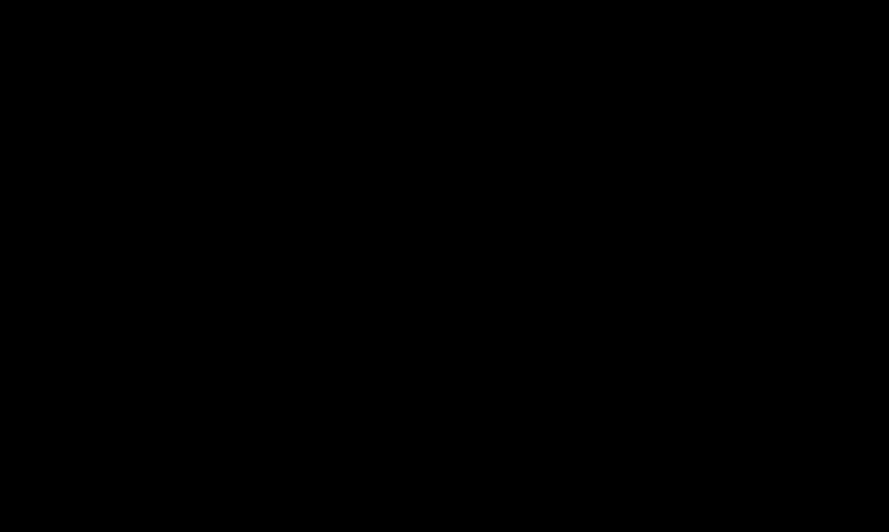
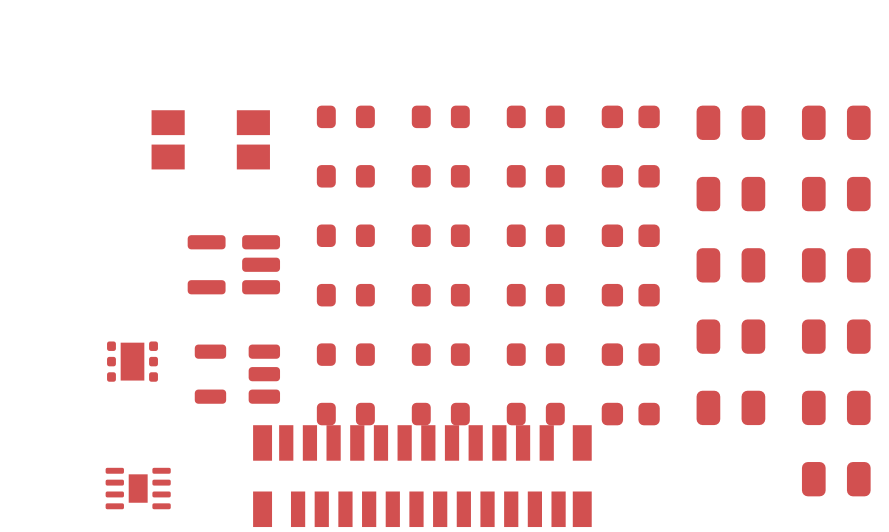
part: none -> (345, 116)
part: none -> (440, 116)
part: none -> (535, 116)
part: none -> (630, 116)
part: none -> (730, 122)
part: none -> (836, 122)
part: none -> (210, 139)
part: none -> (345, 176)
part: none -> (440, 176)
part: none -> (535, 176)
part: none -> (630, 176)
part: none -> (730, 194)
part: none -> (836, 194)
part: none -> (345, 235)
part: none -> (440, 235)
part: none -> (535, 235)
part: none -> (630, 235)
part: none -> (233, 264)
part: none -> (730, 265)
part: none -> (836, 265)
part: none -> (345, 295)
part: none -> (440, 295)
part: none -> (535, 295)
part: none -> (630, 295)
part: none -> (730, 336)
part: none -> (836, 336)
part: none -> (345, 354)
part: none -> (440, 354)
part: none -> (535, 354)
part: none -> (630, 354)
part: none -> (132, 361)
part: none -> (237, 374)
part: none -> (730, 407)
part: none -> (836, 407)
part: none -> (345, 414)
part: none -> (440, 414)
part: none -> (535, 414)
part: none -> (630, 414)
part: none -> (422, 476)
part: none -> (836, 479)
part: none -> (138, 488)

